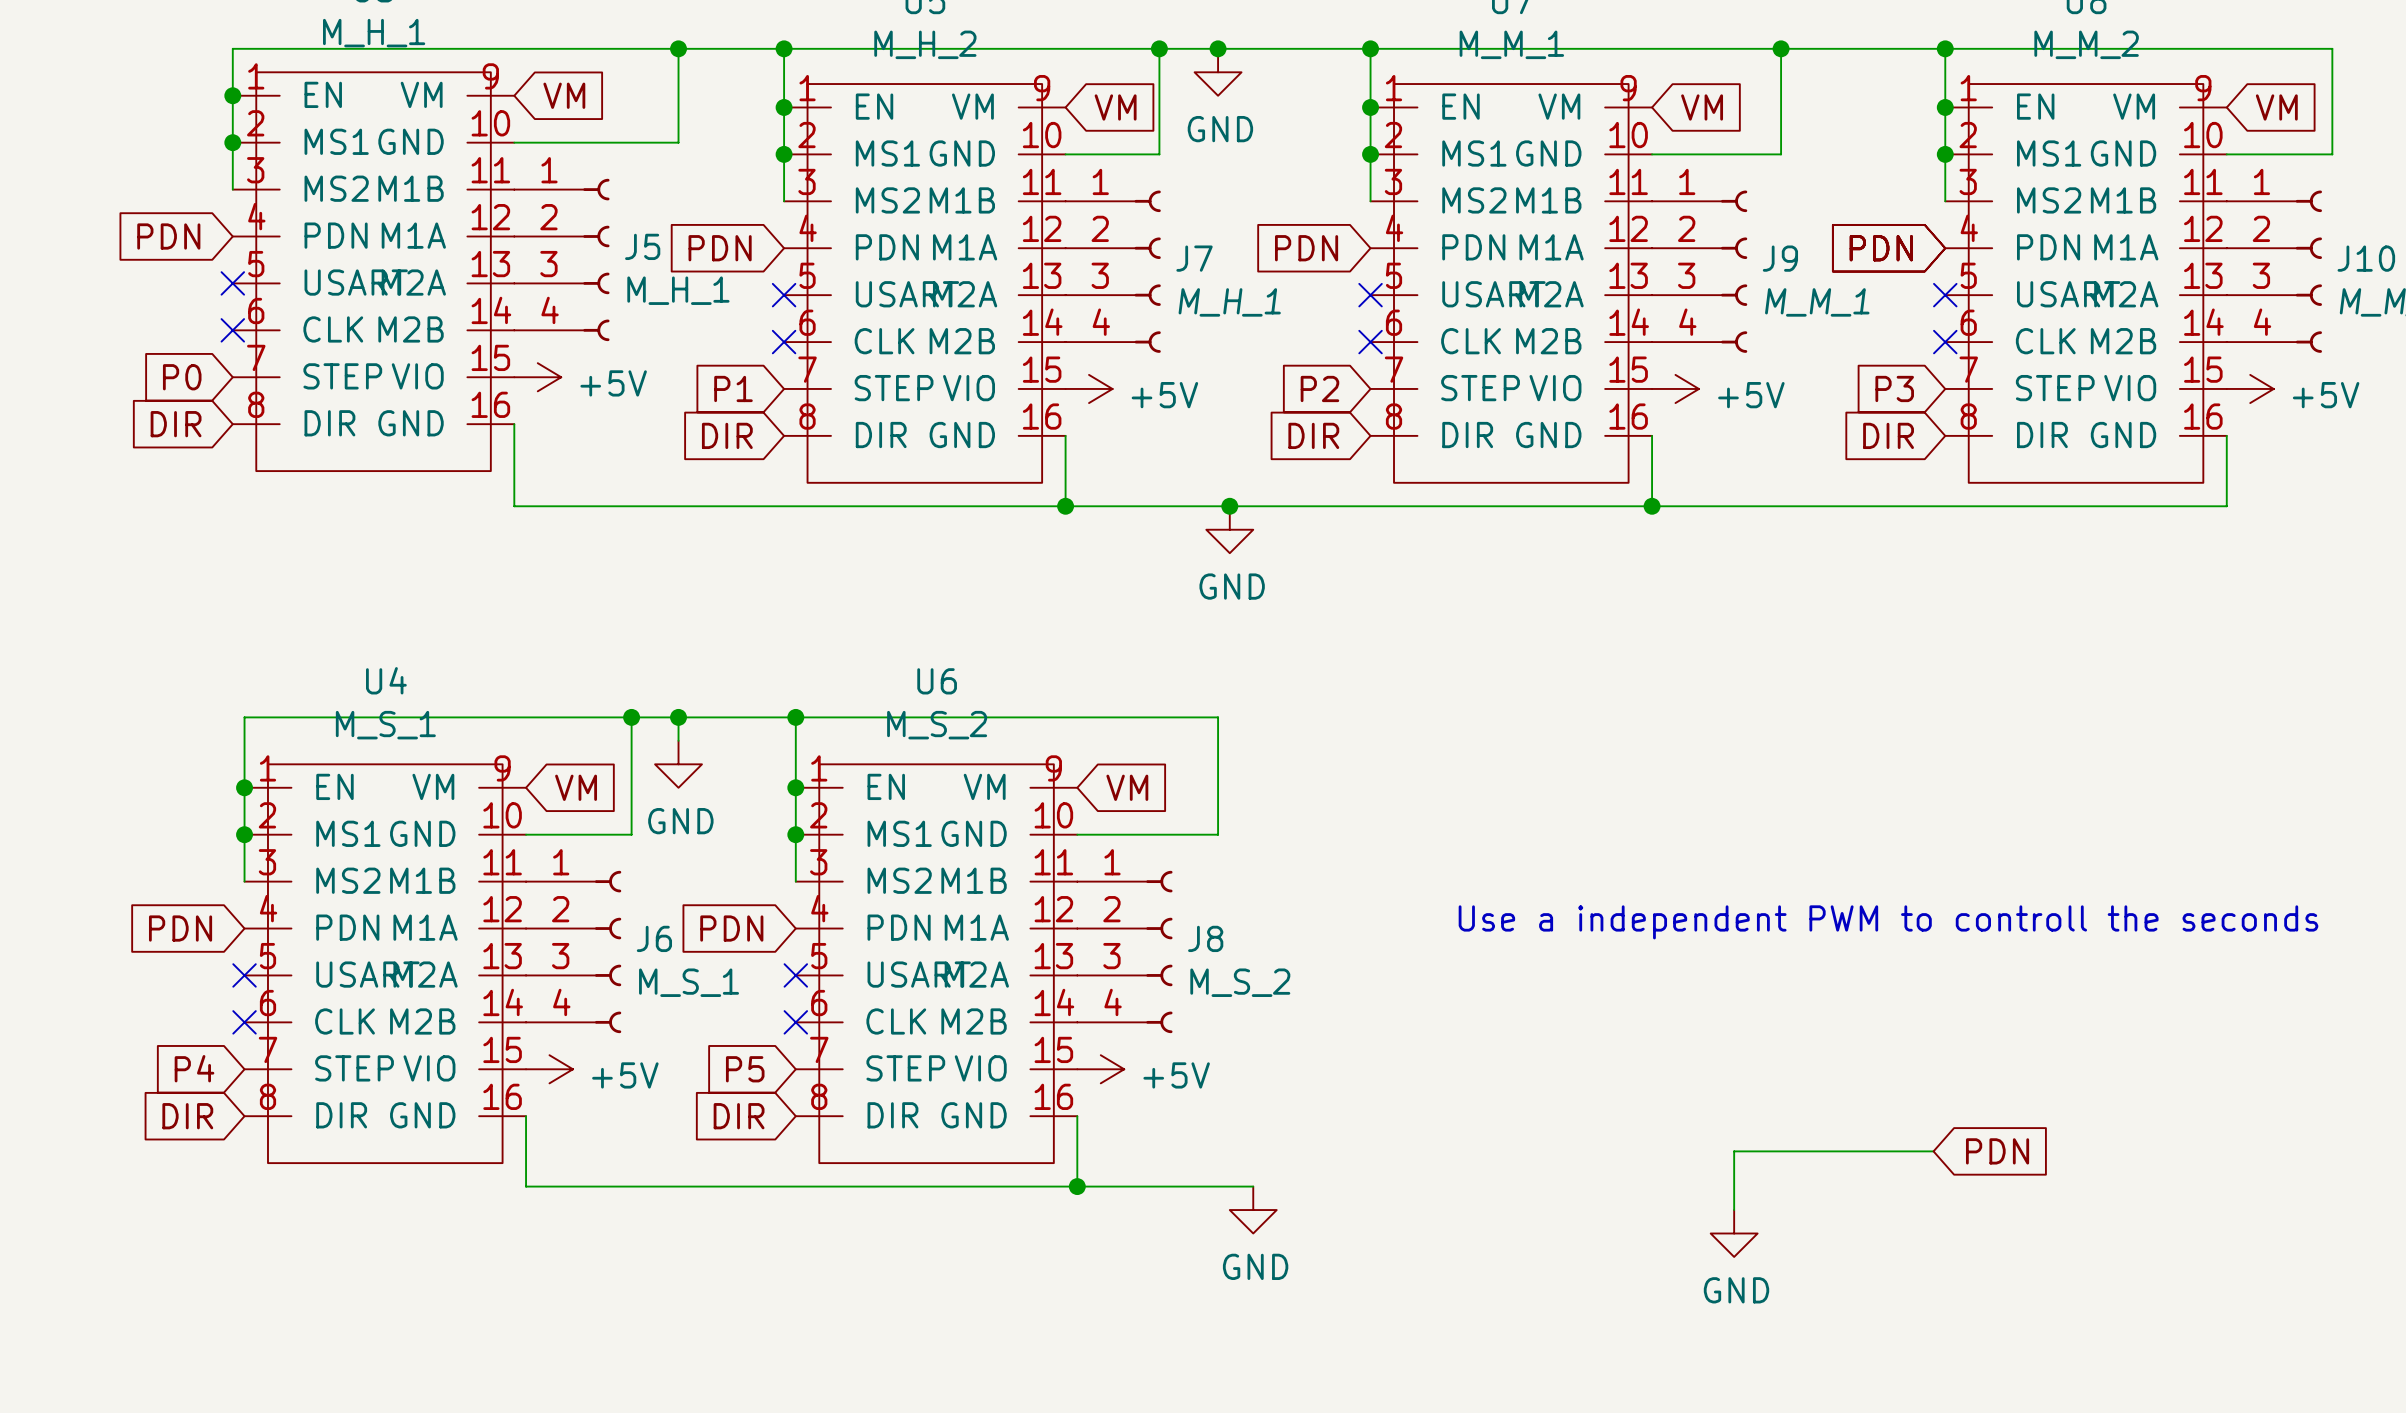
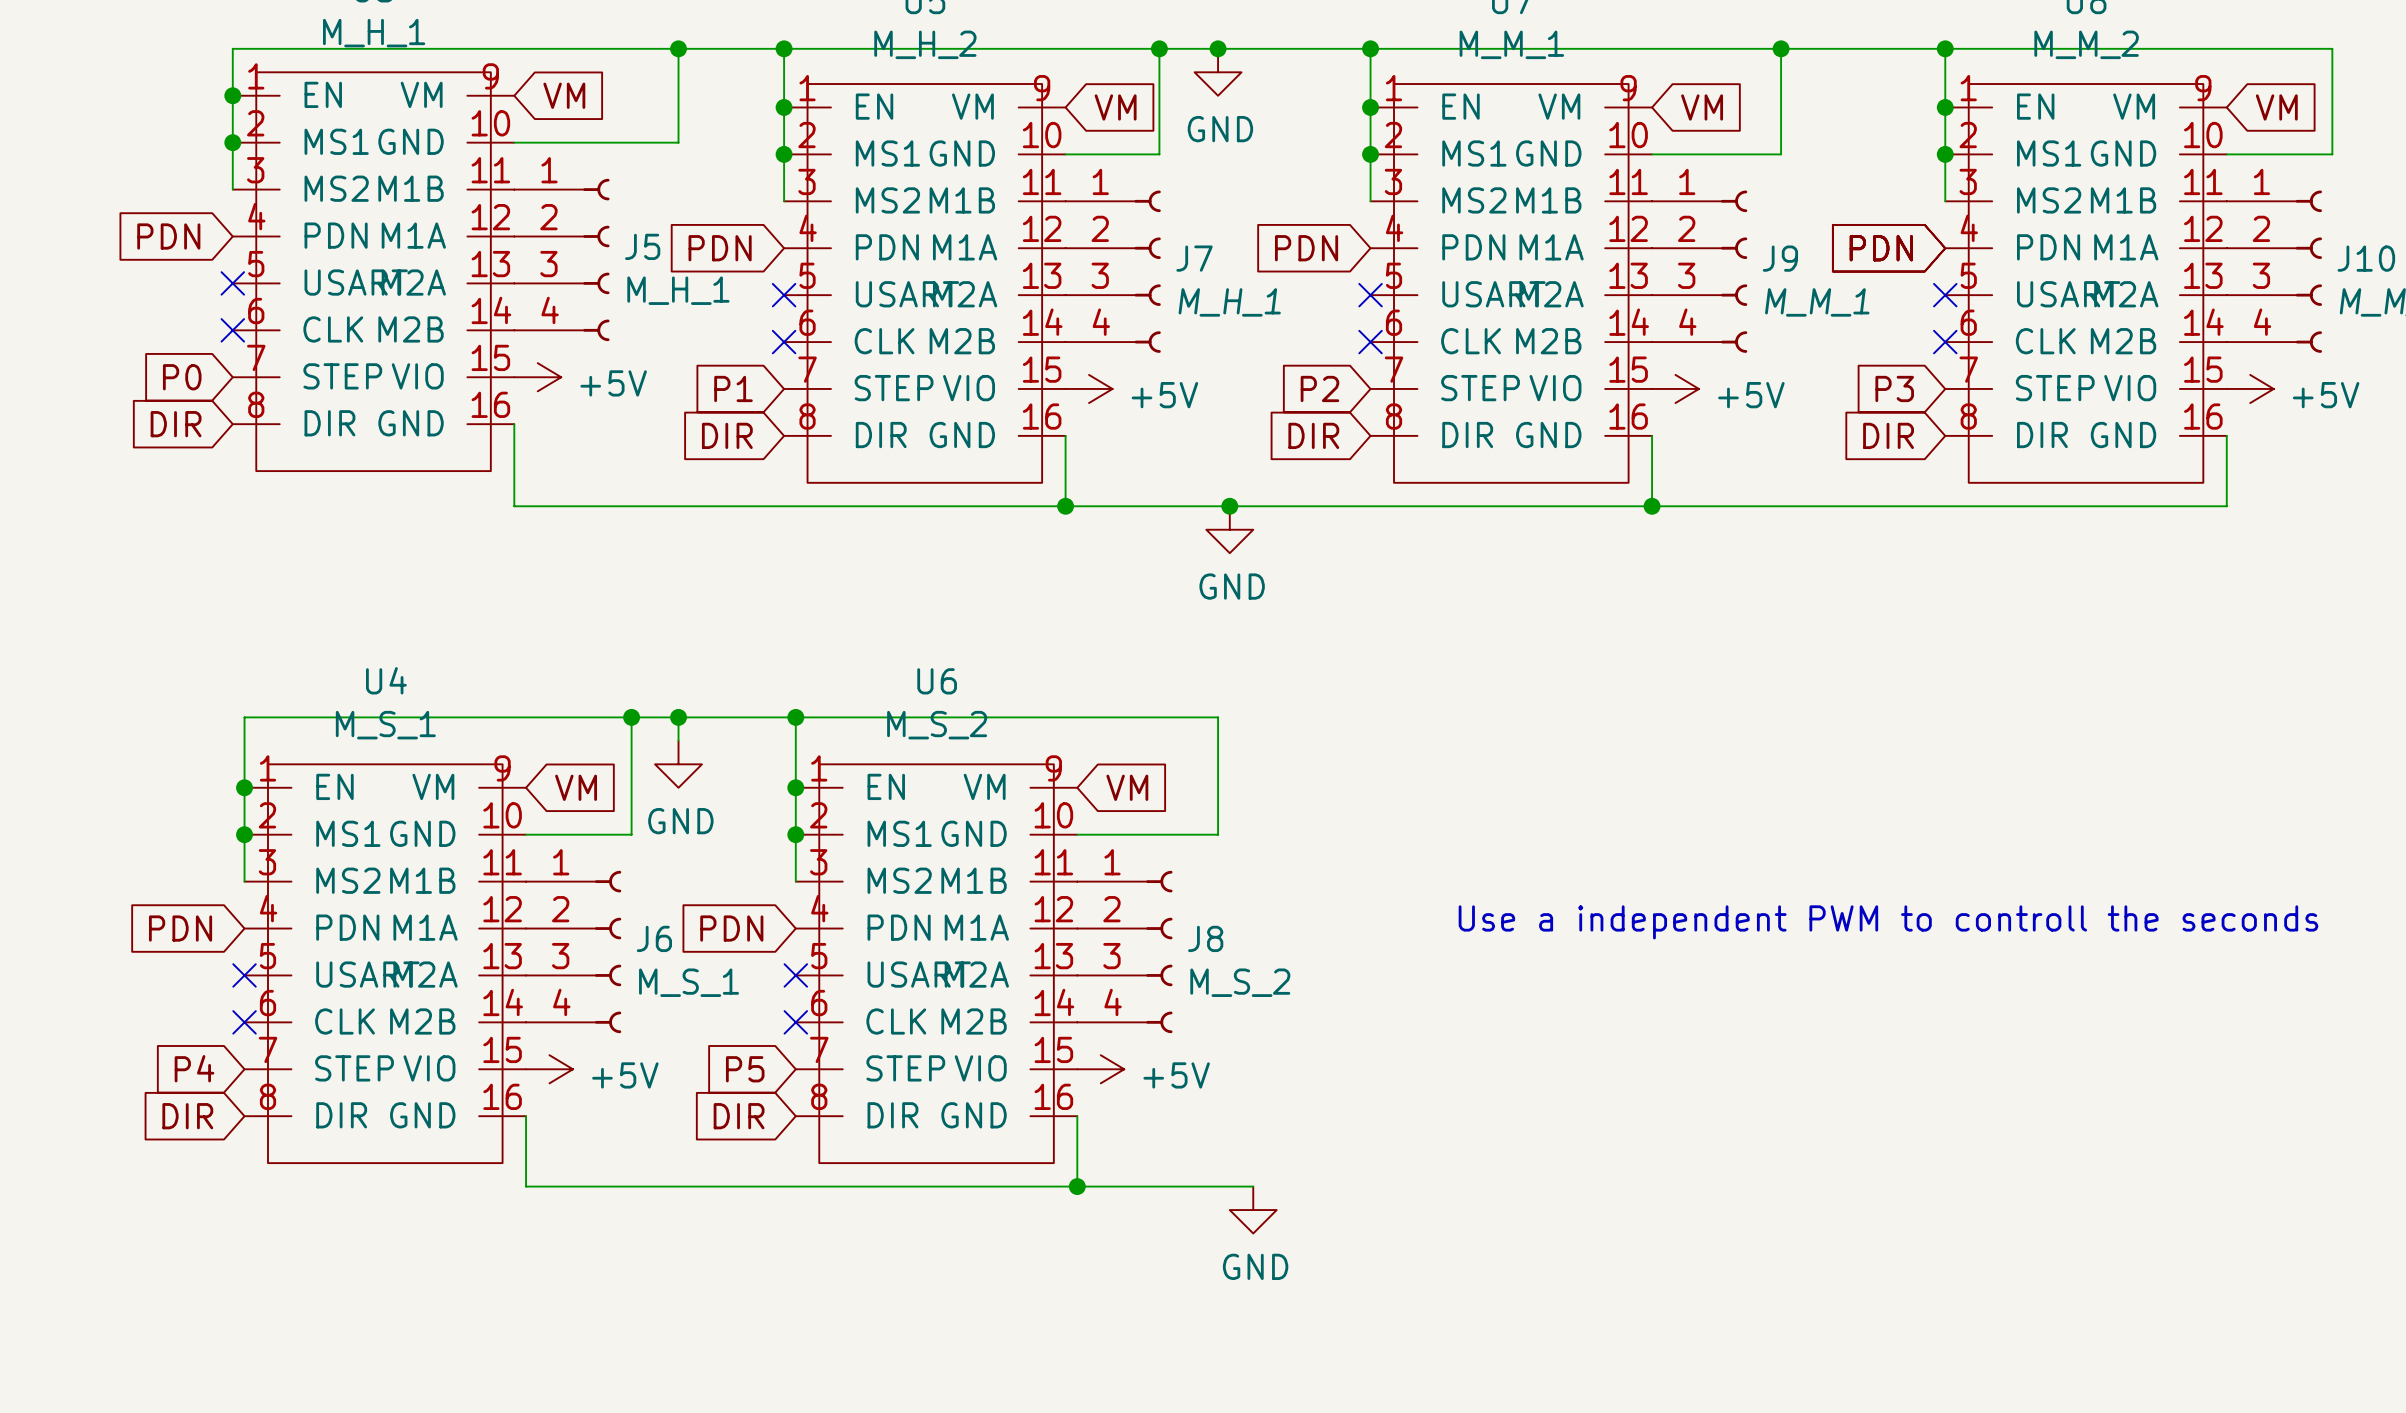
wire: (1933, 1151) (1734, 1151) (1734, 1210) -> none
global label: PDN (1997, 1151) -> none
power symbol: GND (1734, 1233) -> none

